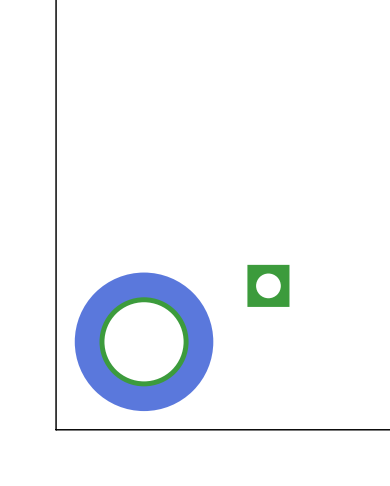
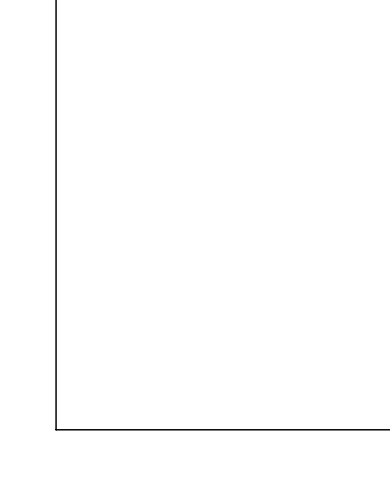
part: (268, 285) -> none
part: (144, 341) -> none

